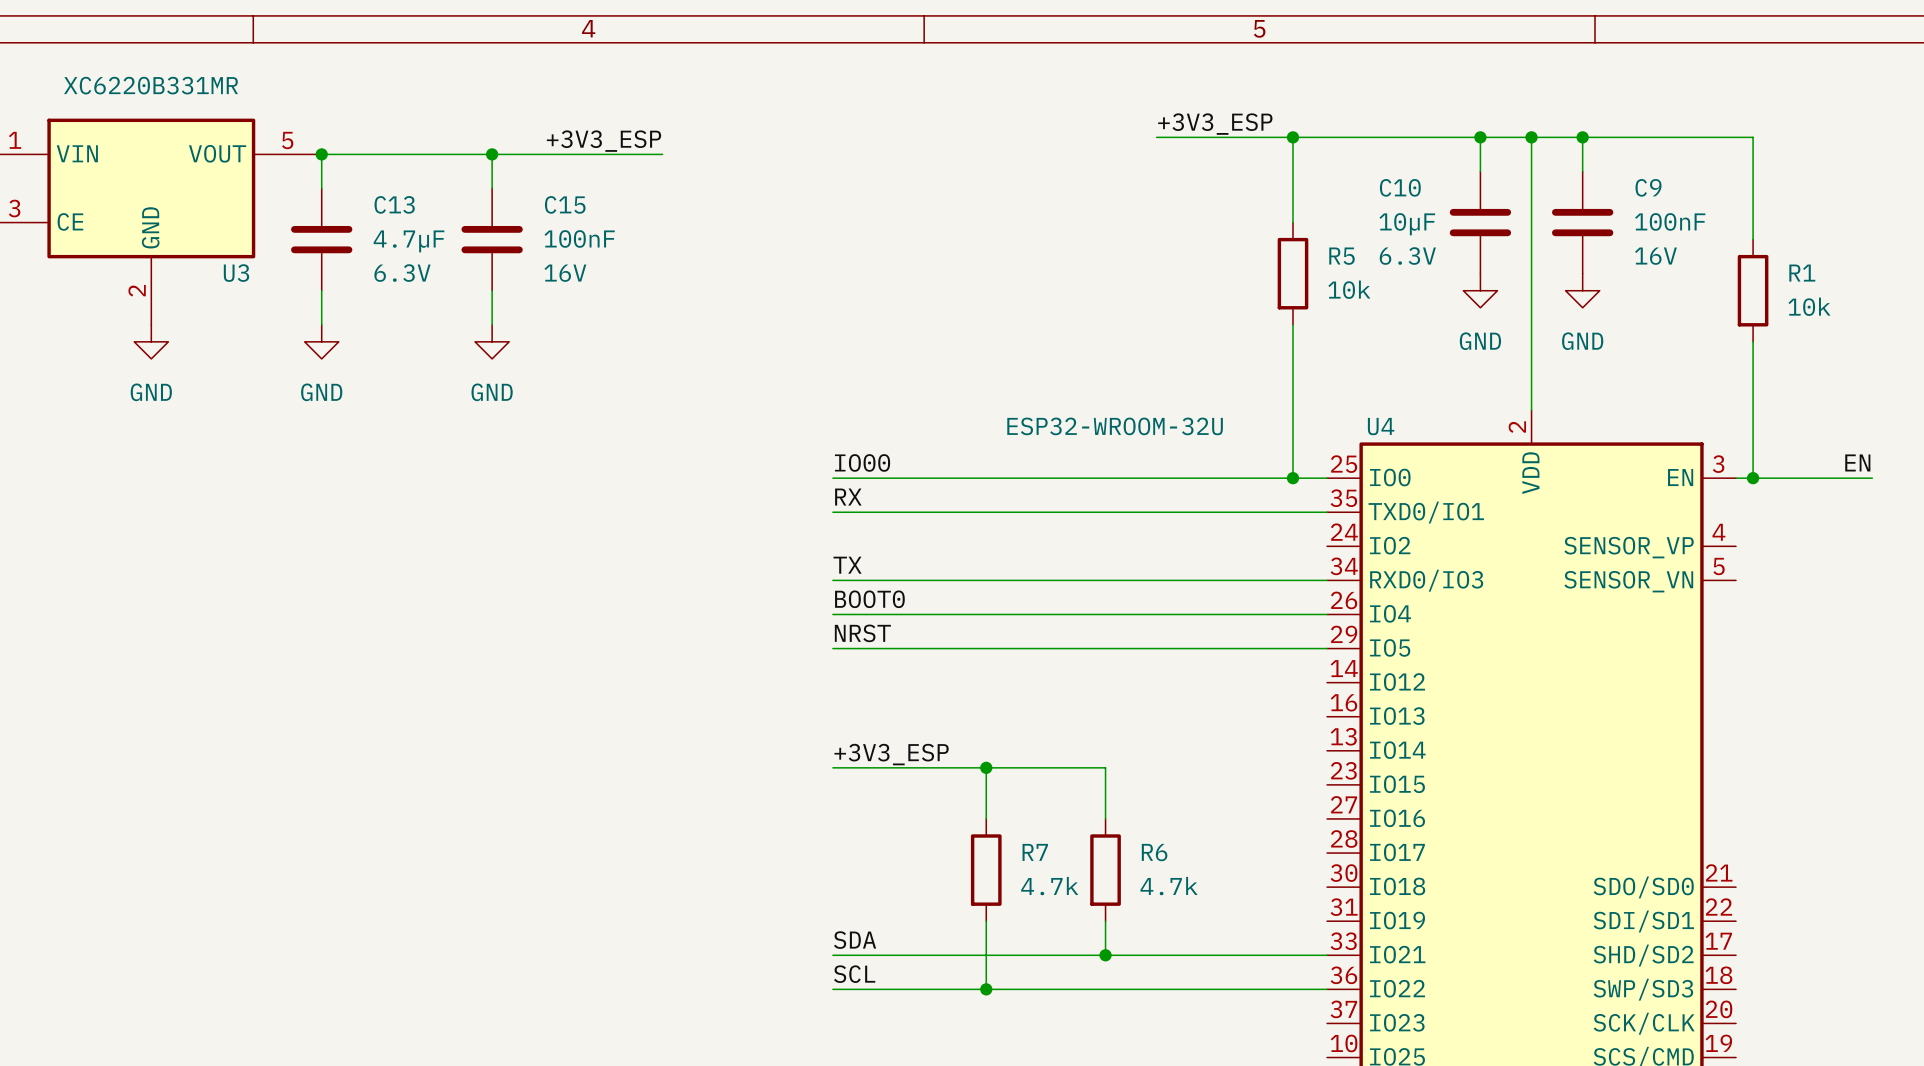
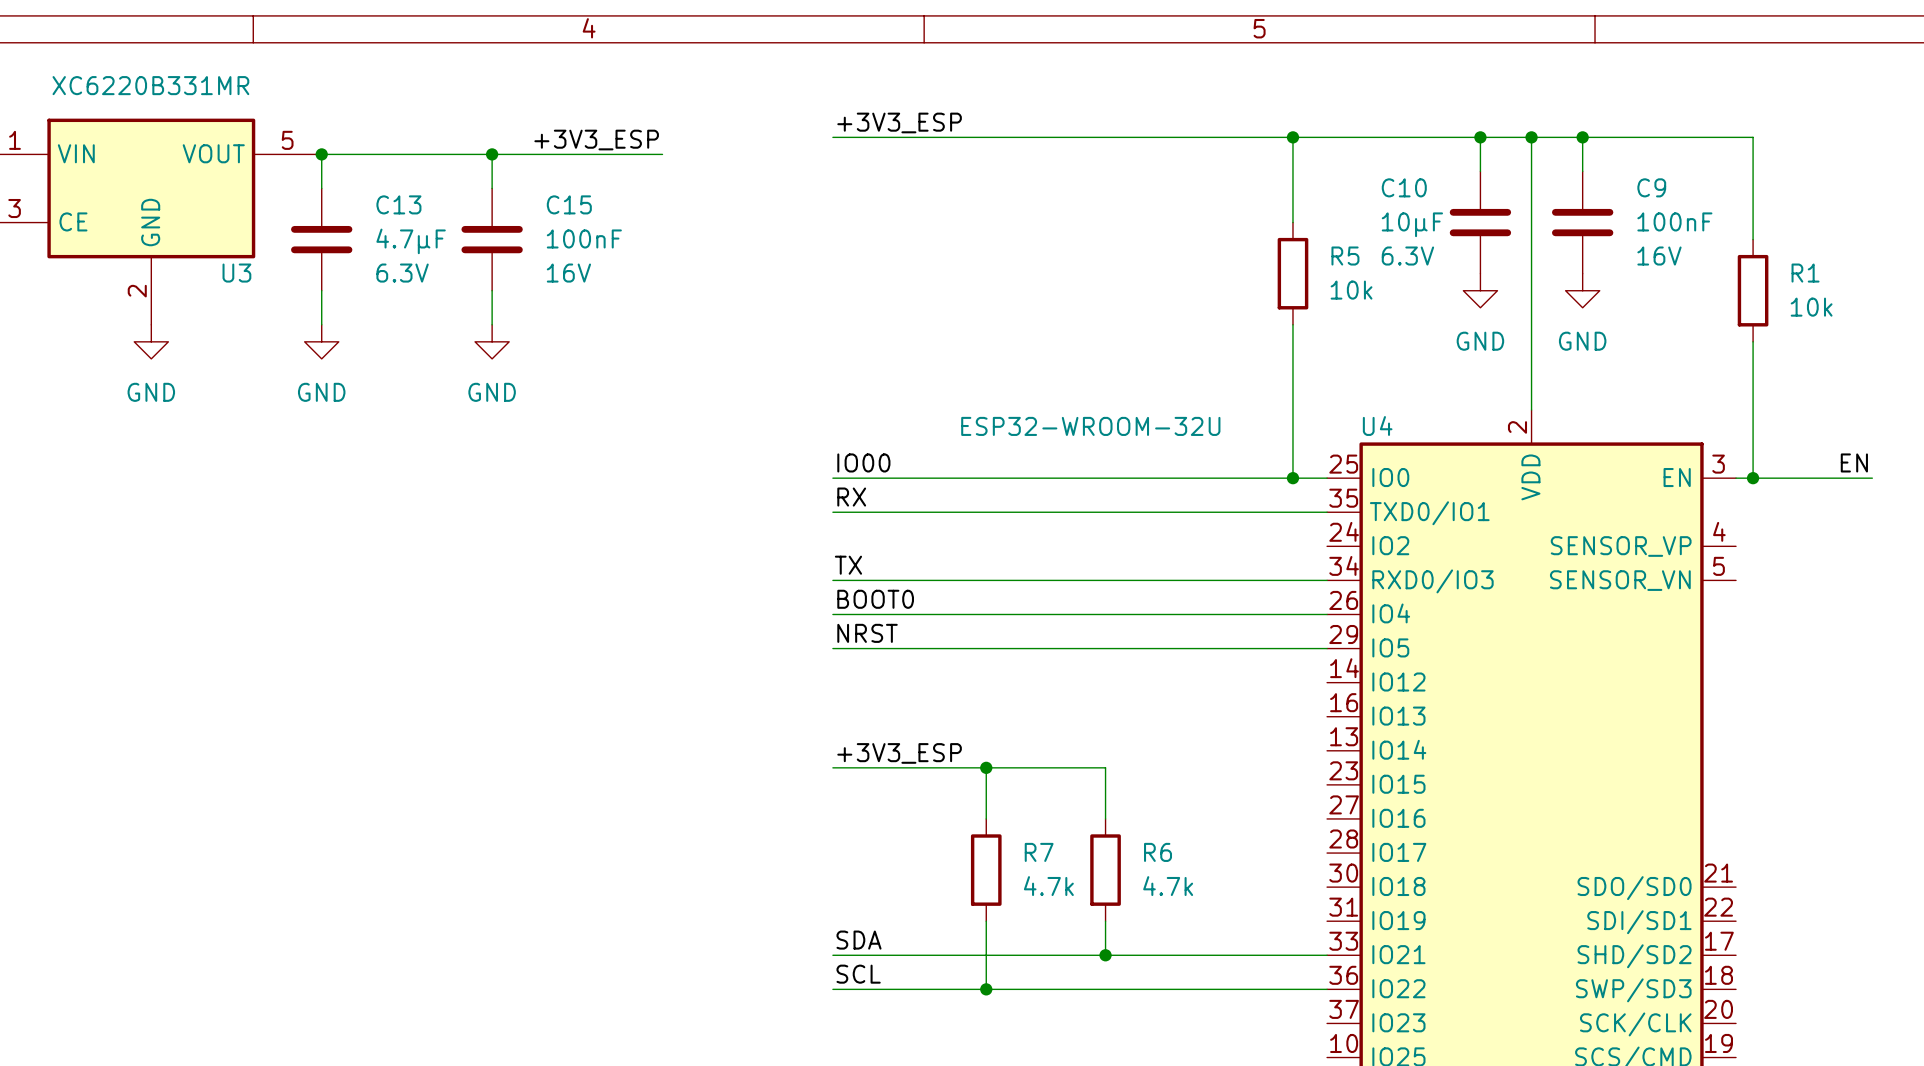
label position: +3V3_ESP (1215, 124) -> +3V3_ESP (899, 122)
wire: none -> (832, 137) (1156, 137)

